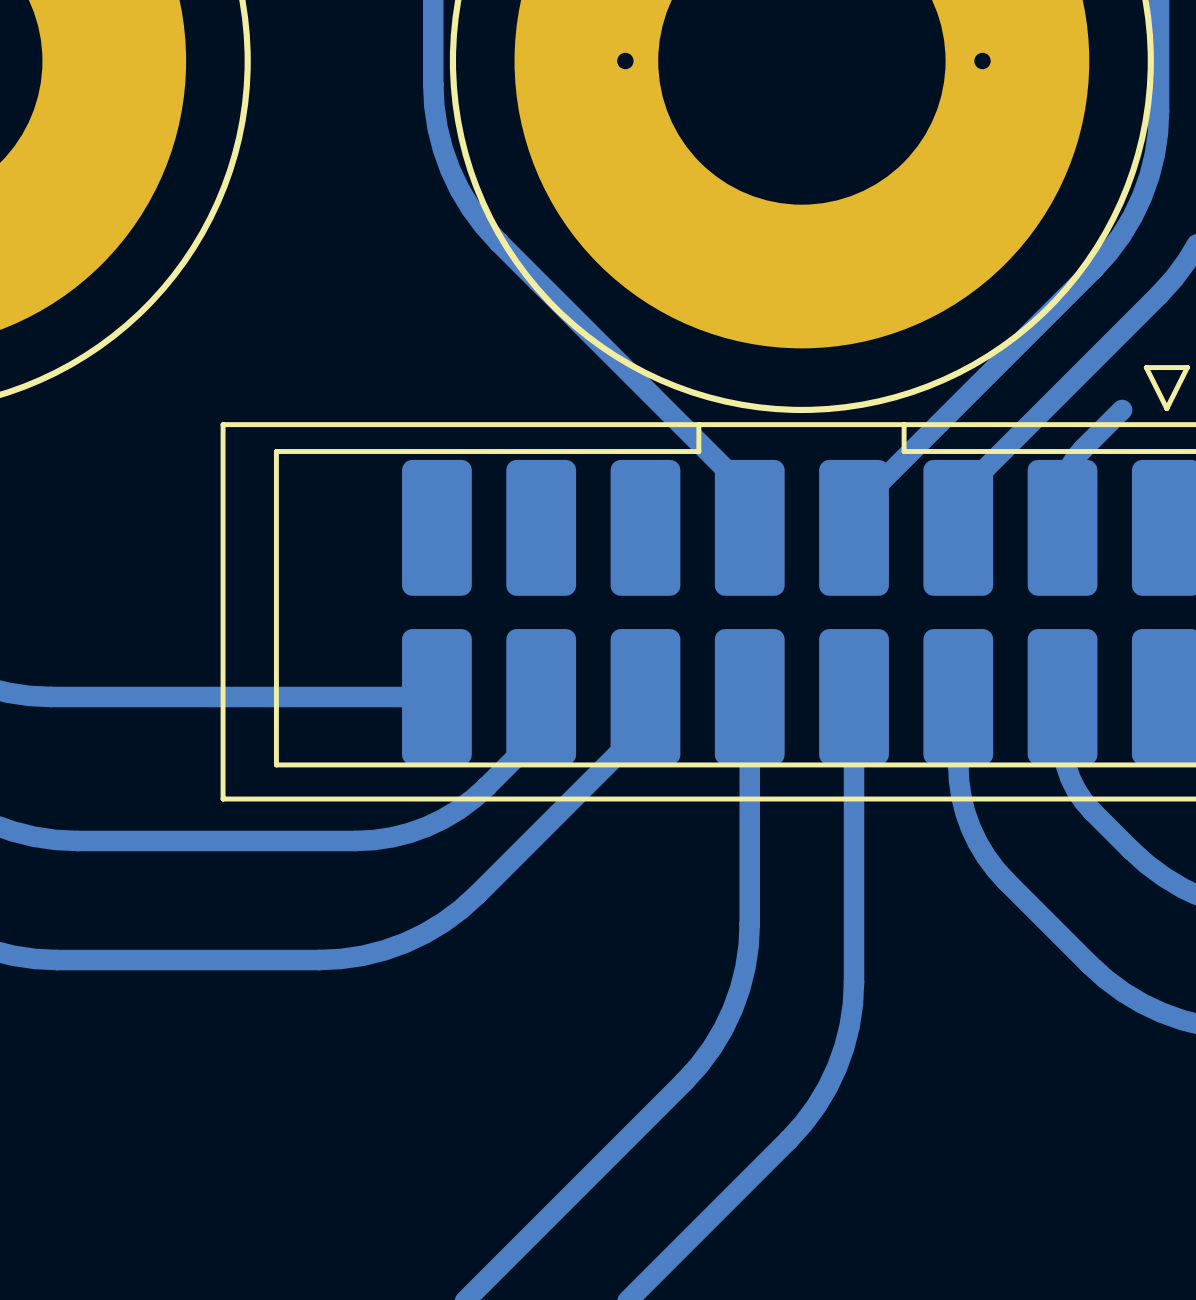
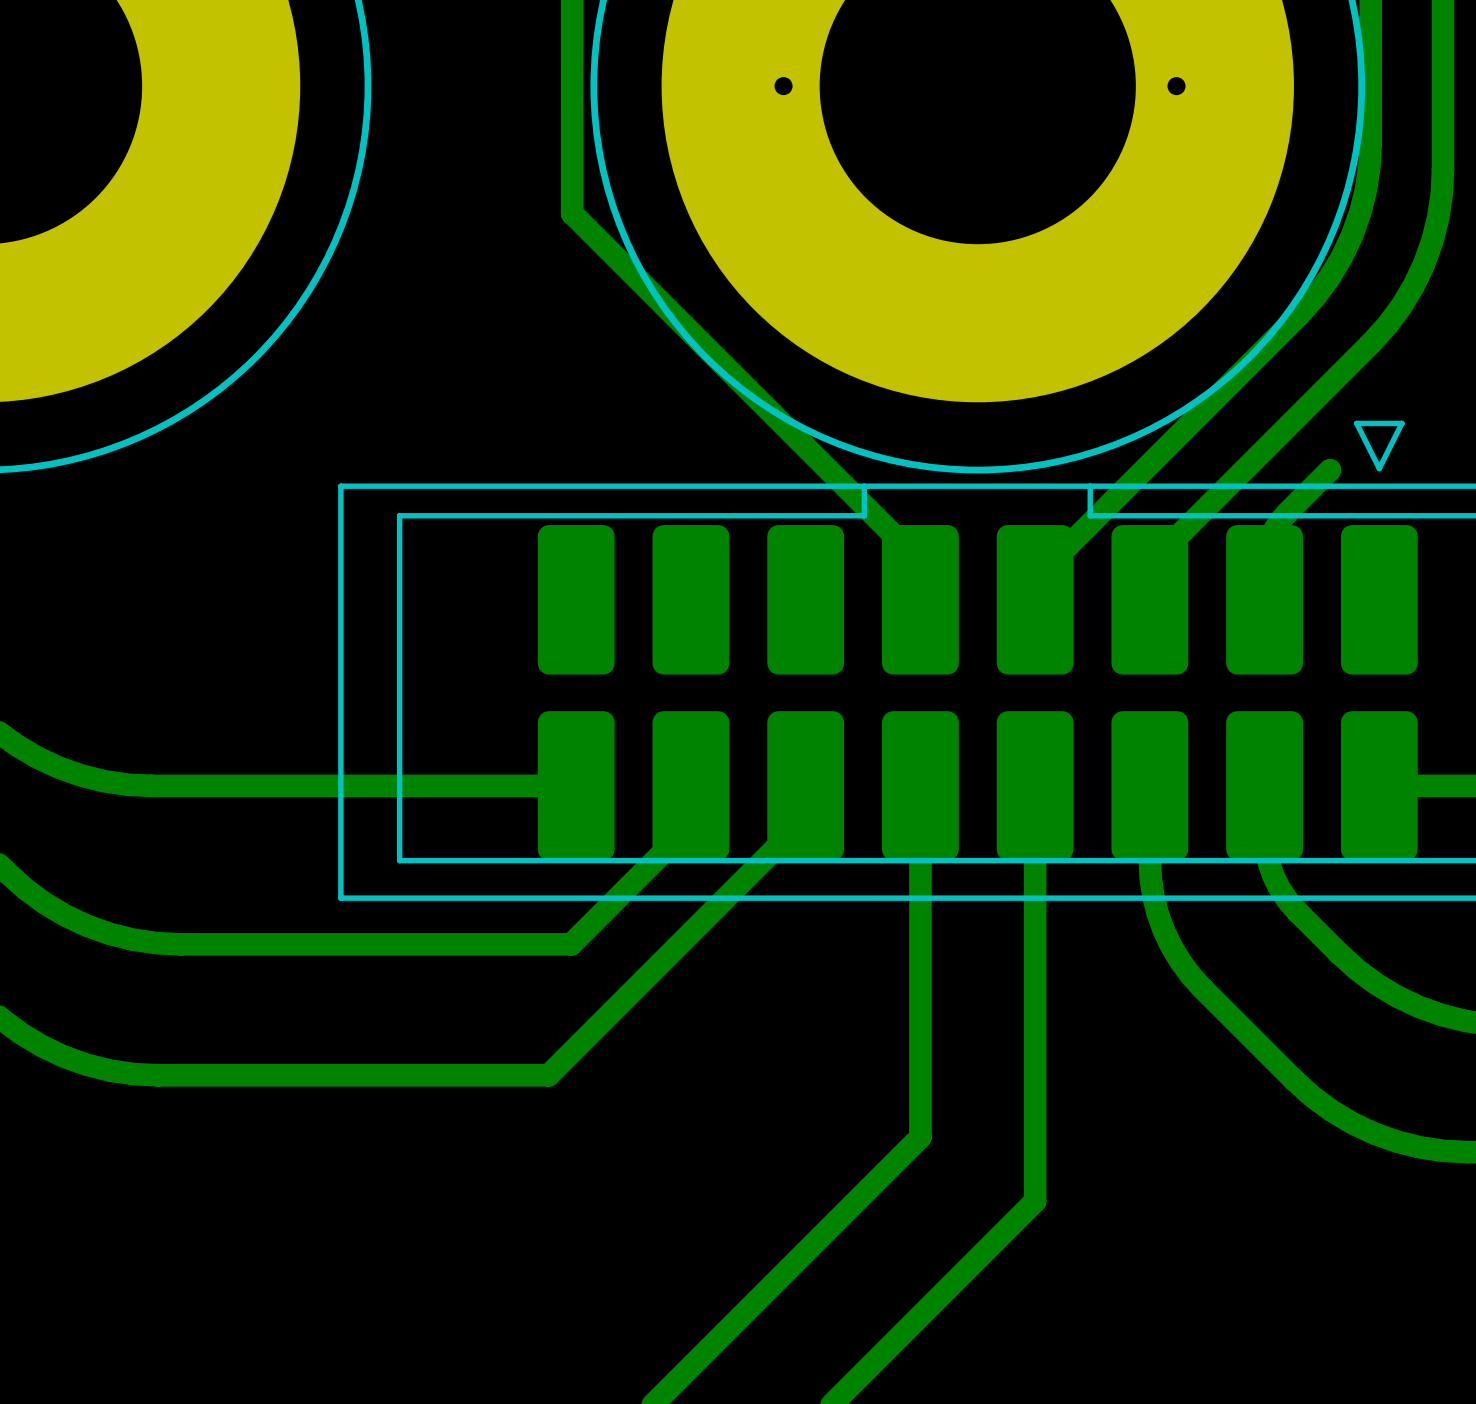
track: (433, 84) (437, 127) (450, 169) (470, 208) (498, 242) -> (572, 111) (572, 213) (644, 285)
track: (486, 786) (458, 809) (426, 826) (391, 837) (355, 840) -> (631, 884) (571, 944) (486, 944)
track: (477, 894) (443, 922) (404, 943) (362, 955) (319, 960) -> (620, 1003) (548, 1075) (446, 1075)
track: (749, 923) (745, 967) (732, 1009) (712, 1047) (684, 1081) -> (920, 1035) (920, 1137) (848, 1209)
track: (854, 982) (849, 1025) (837, 1067) (816, 1106) (788, 1140) -> (1035, 1099) (1035, 1201) (963, 1273)

